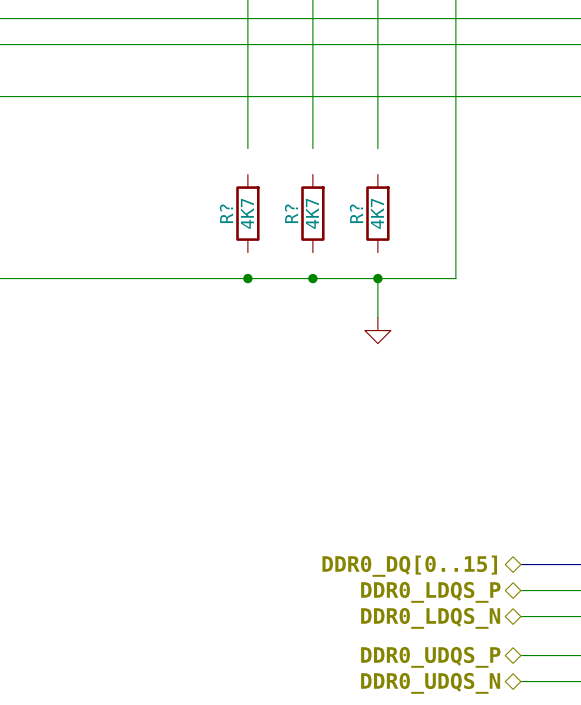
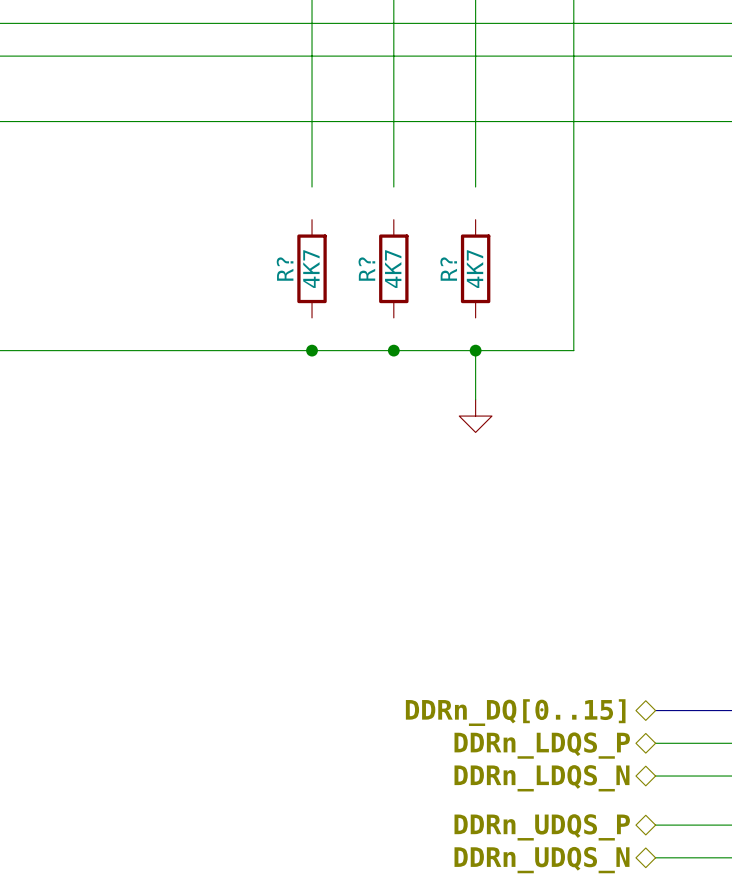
hierarchical label: DDR0_DQ[0..15] (409, 566) -> DDRn_DQ[0..15] (515, 712)
hierarchical label: DDR0_LDQS_P (430, 592) -> DDRn_LDQS_P (542, 745)
hierarchical label: DDR0_LDQS_N (430, 618) -> DDRn_LDQS_N (541, 778)
hierarchical label: DDR0_UDQS_P (430, 657) -> DDRn_UDQS_P (542, 827)
hierarchical label: DDR0_UDQS_N (430, 683) -> DDRn_UDQS_N (541, 860)

